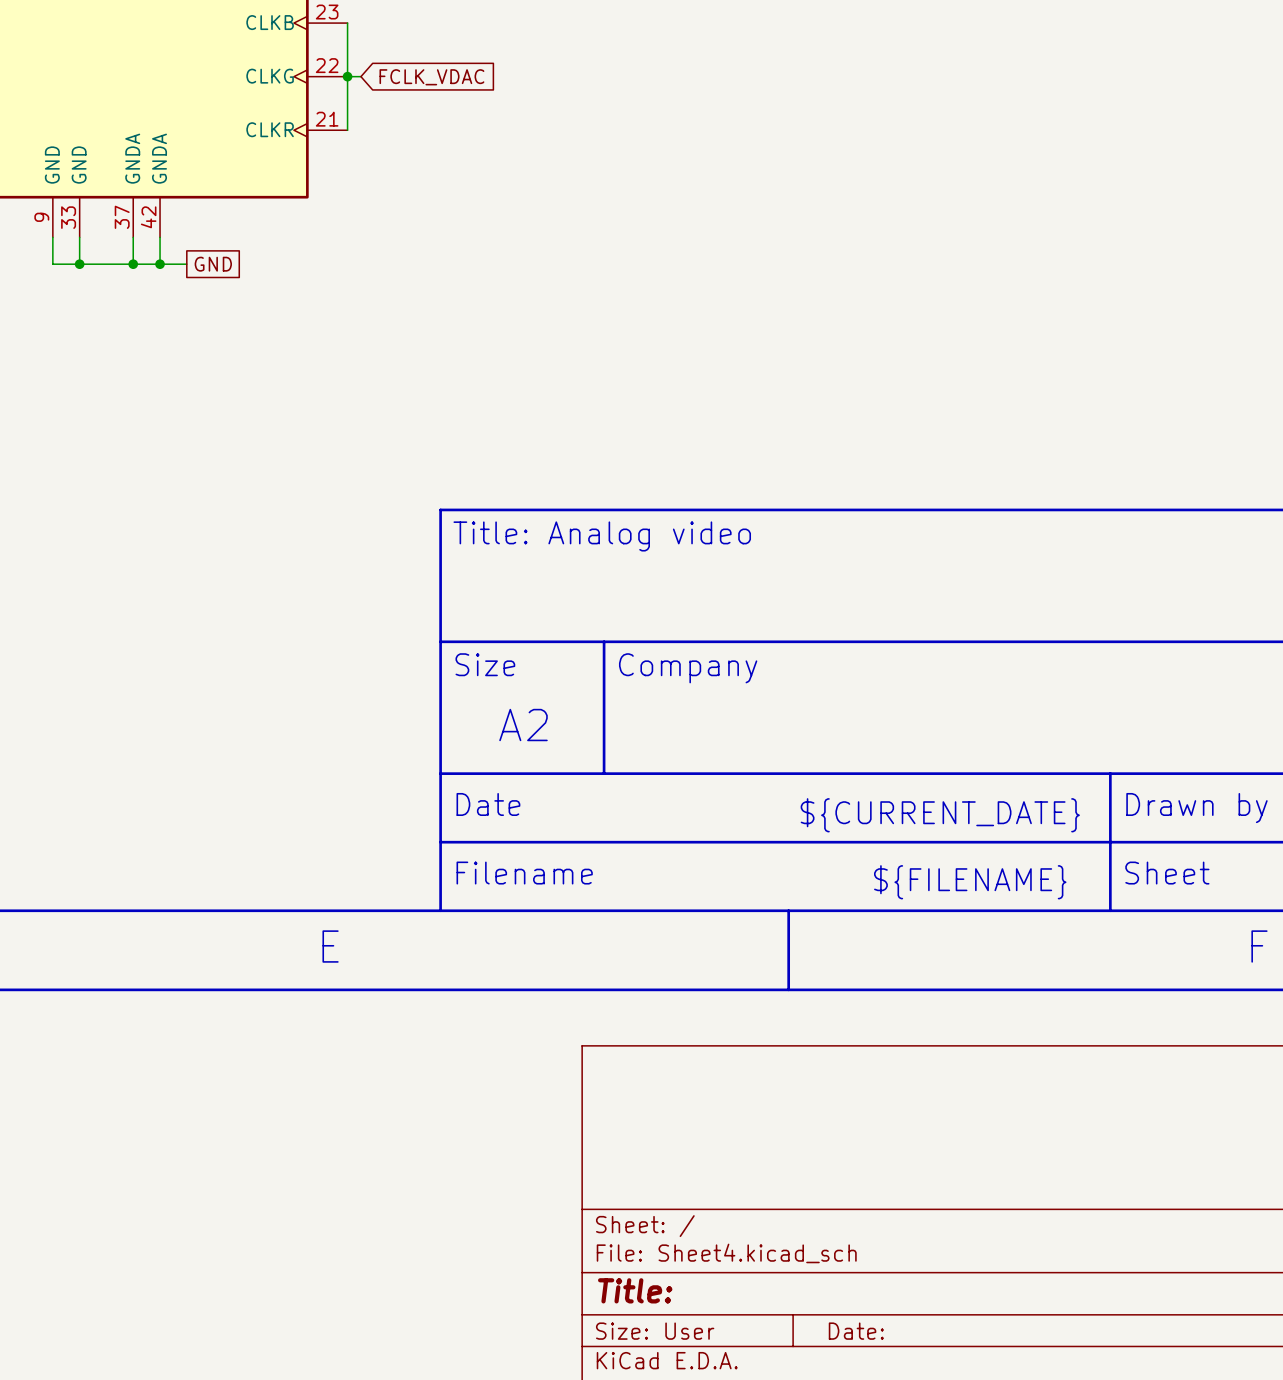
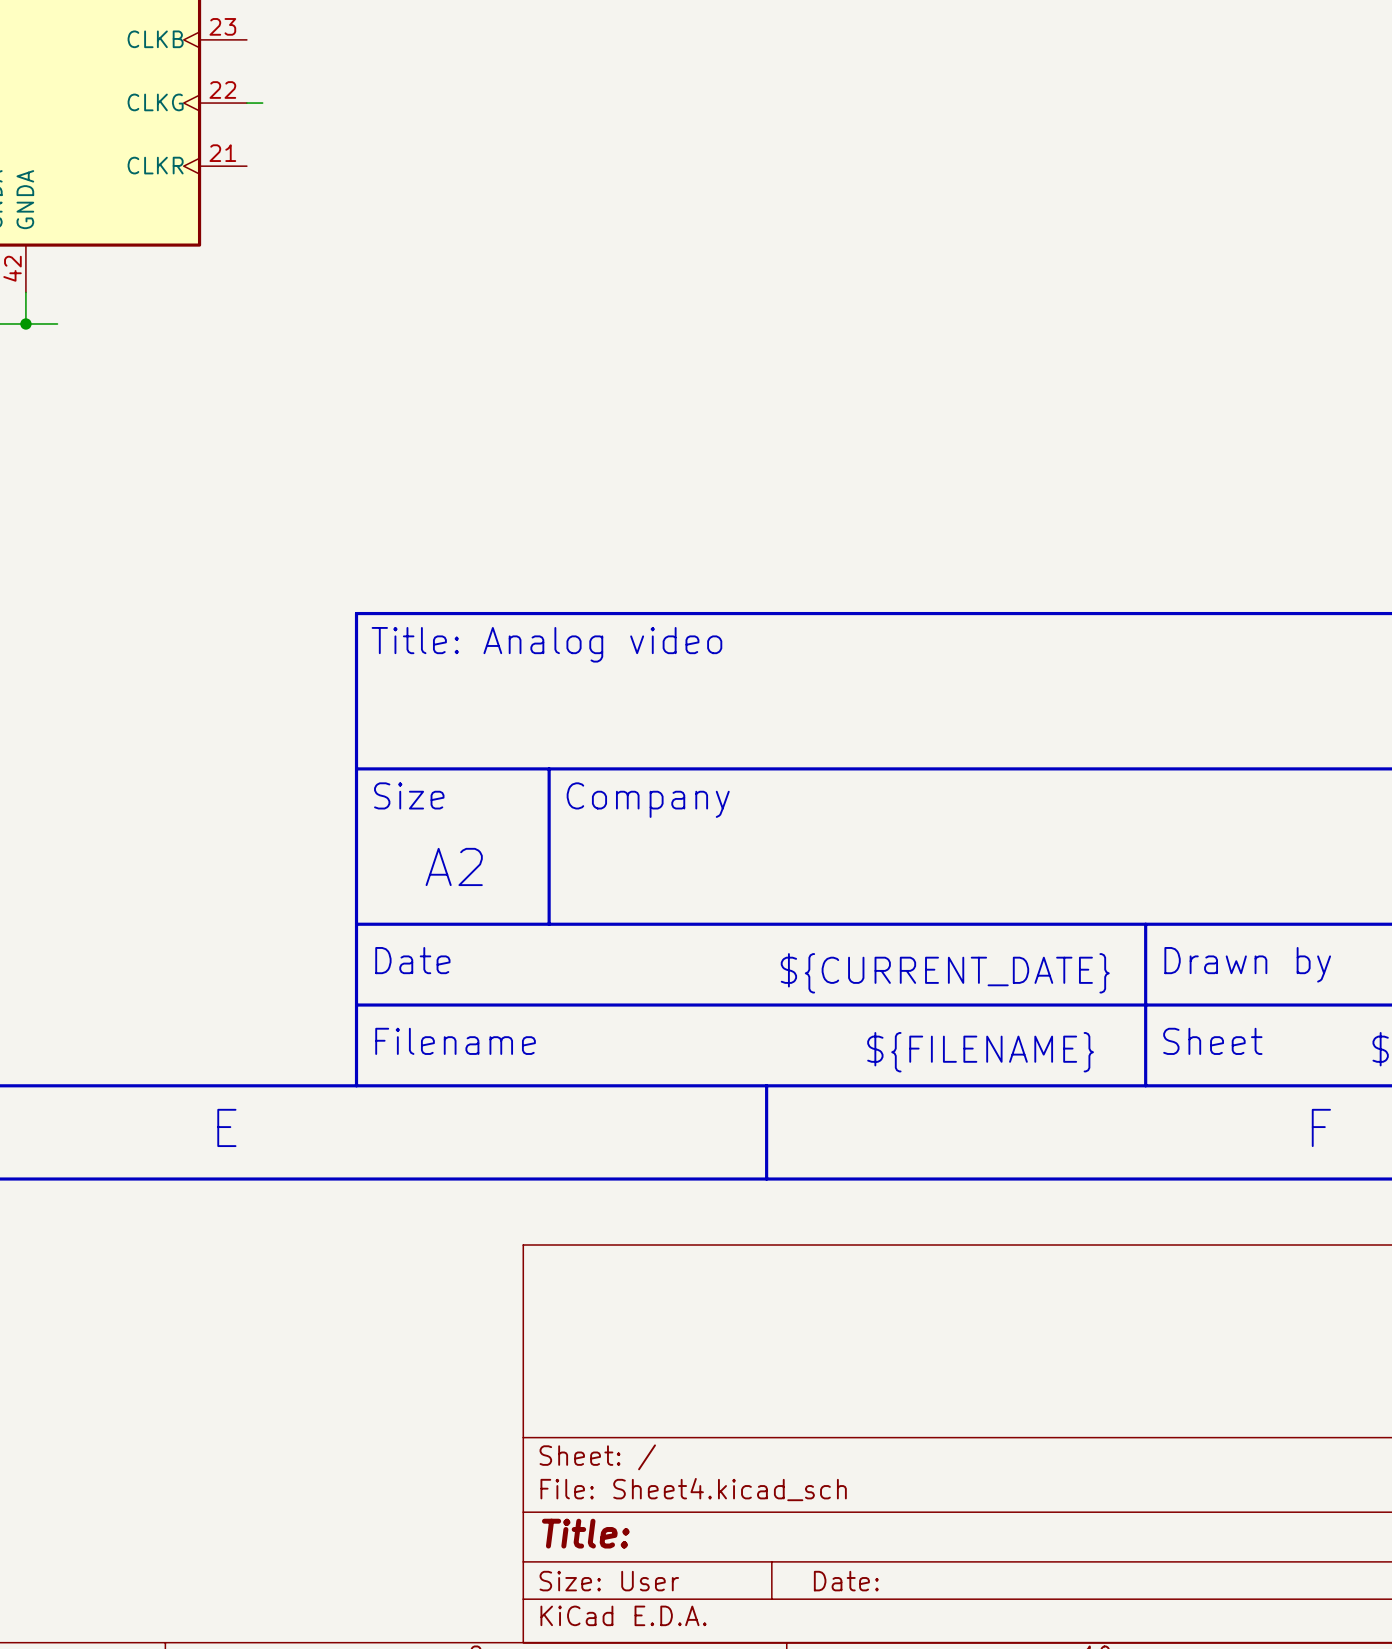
wire: (347, 23) (347, 130) -> none
junction: (347, 76) -> none
global label: FCLK_VDAC (431, 77) -> none
global label: GND (213, 264) -> none

